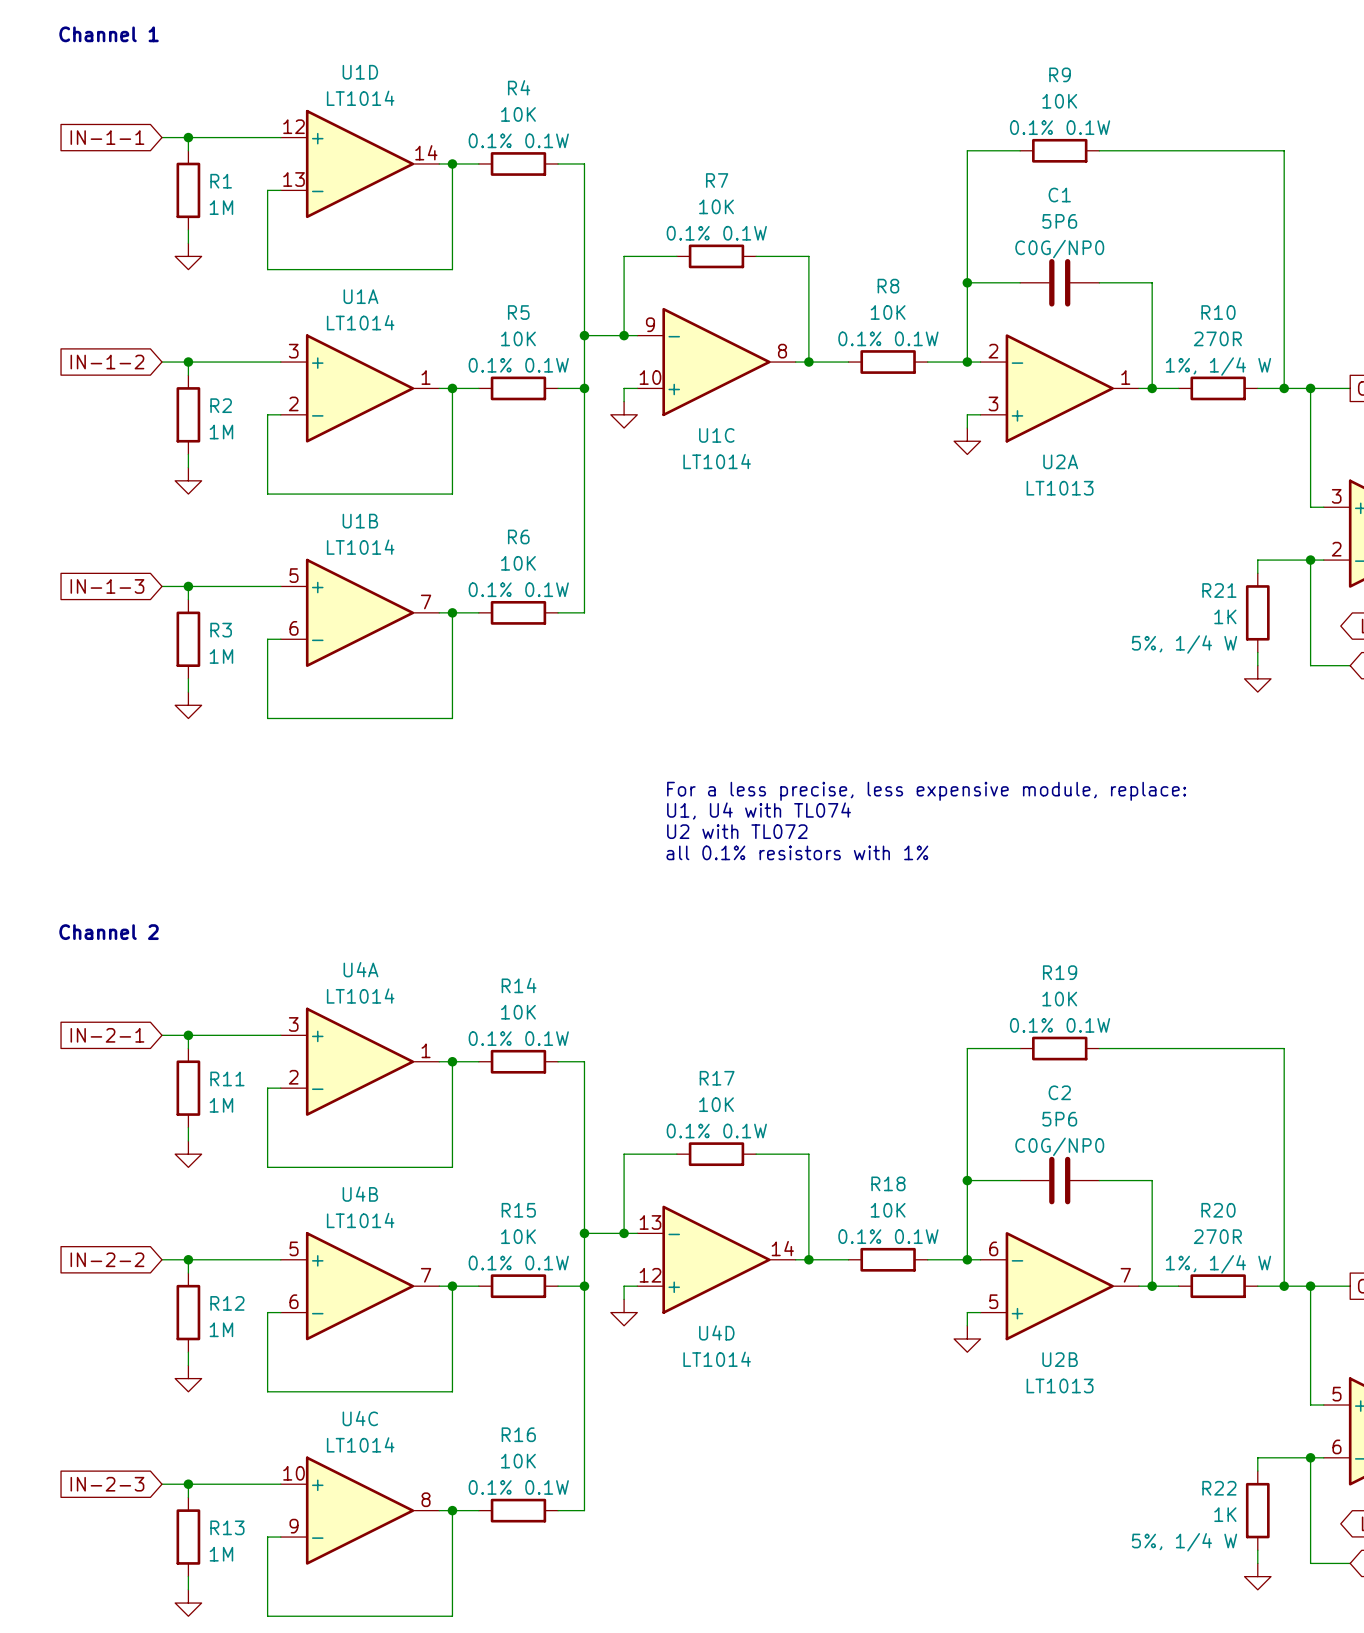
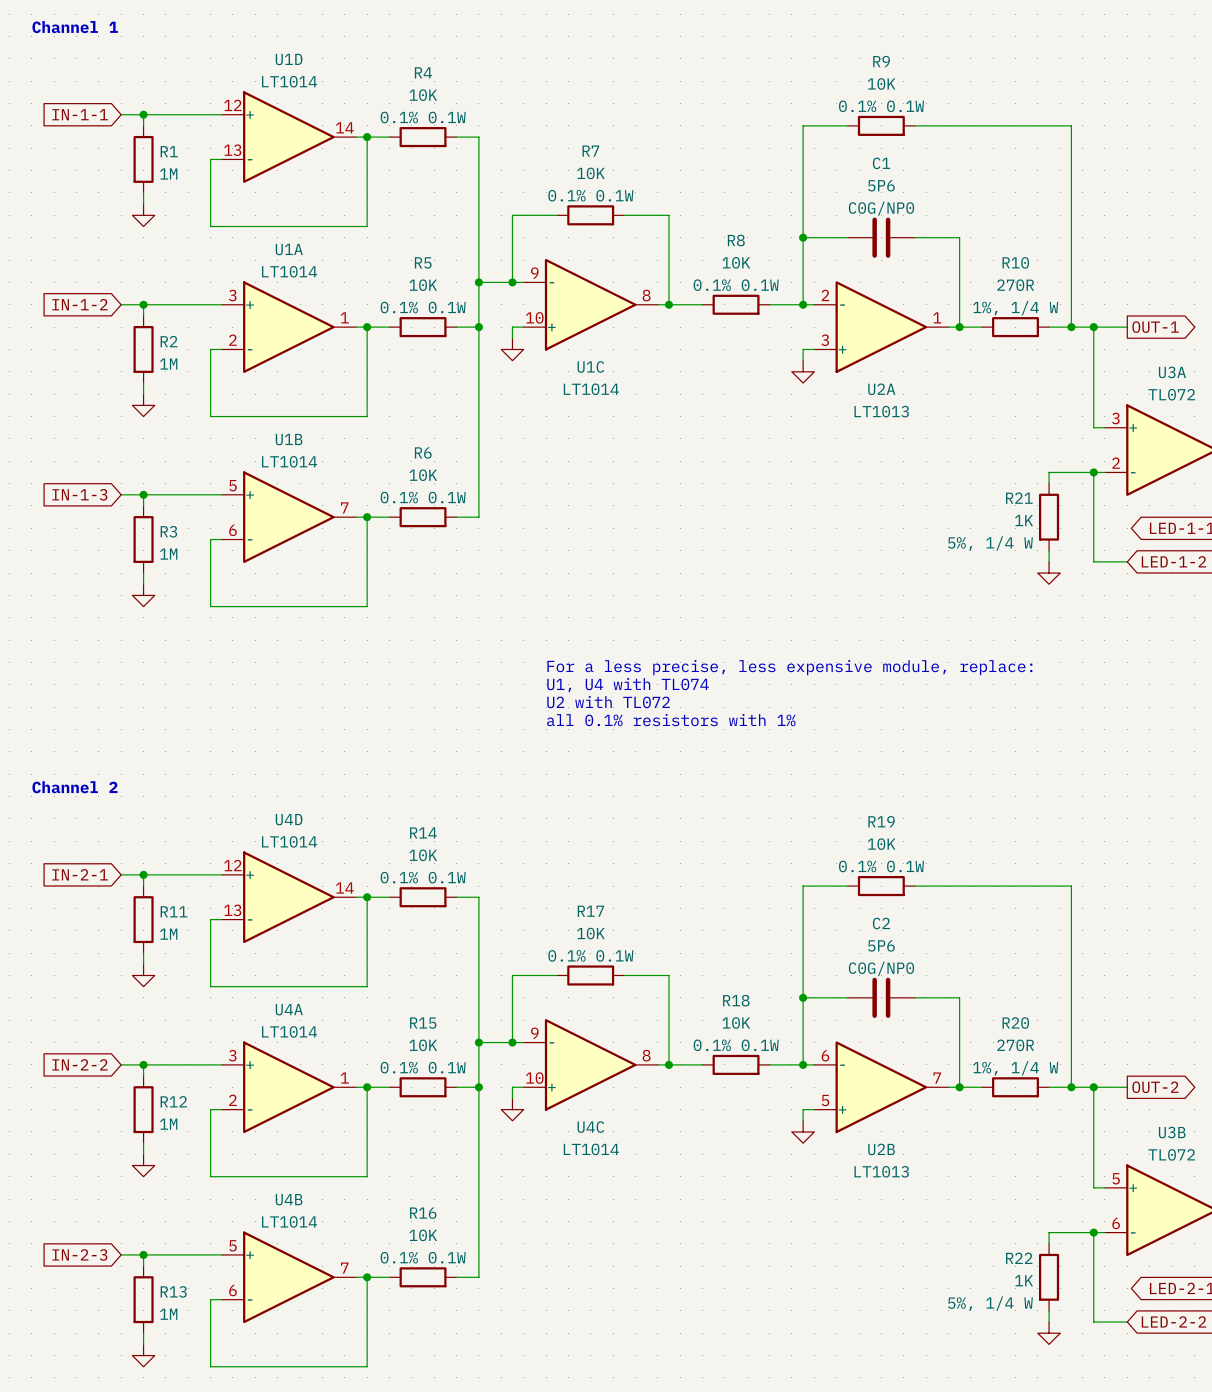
U4A position: (360, 1061) -> (288, 1087)
U4D flip: as is (716, 1259) -> up-down (288, 897)
U4D position: (716, 1259) -> (288, 897)
U4B position: (360, 1286) -> (288, 1277)
U4C flip: as is (360, 1510) -> up-down (590, 1064)
U4C position: (360, 1510) -> (590, 1064)

